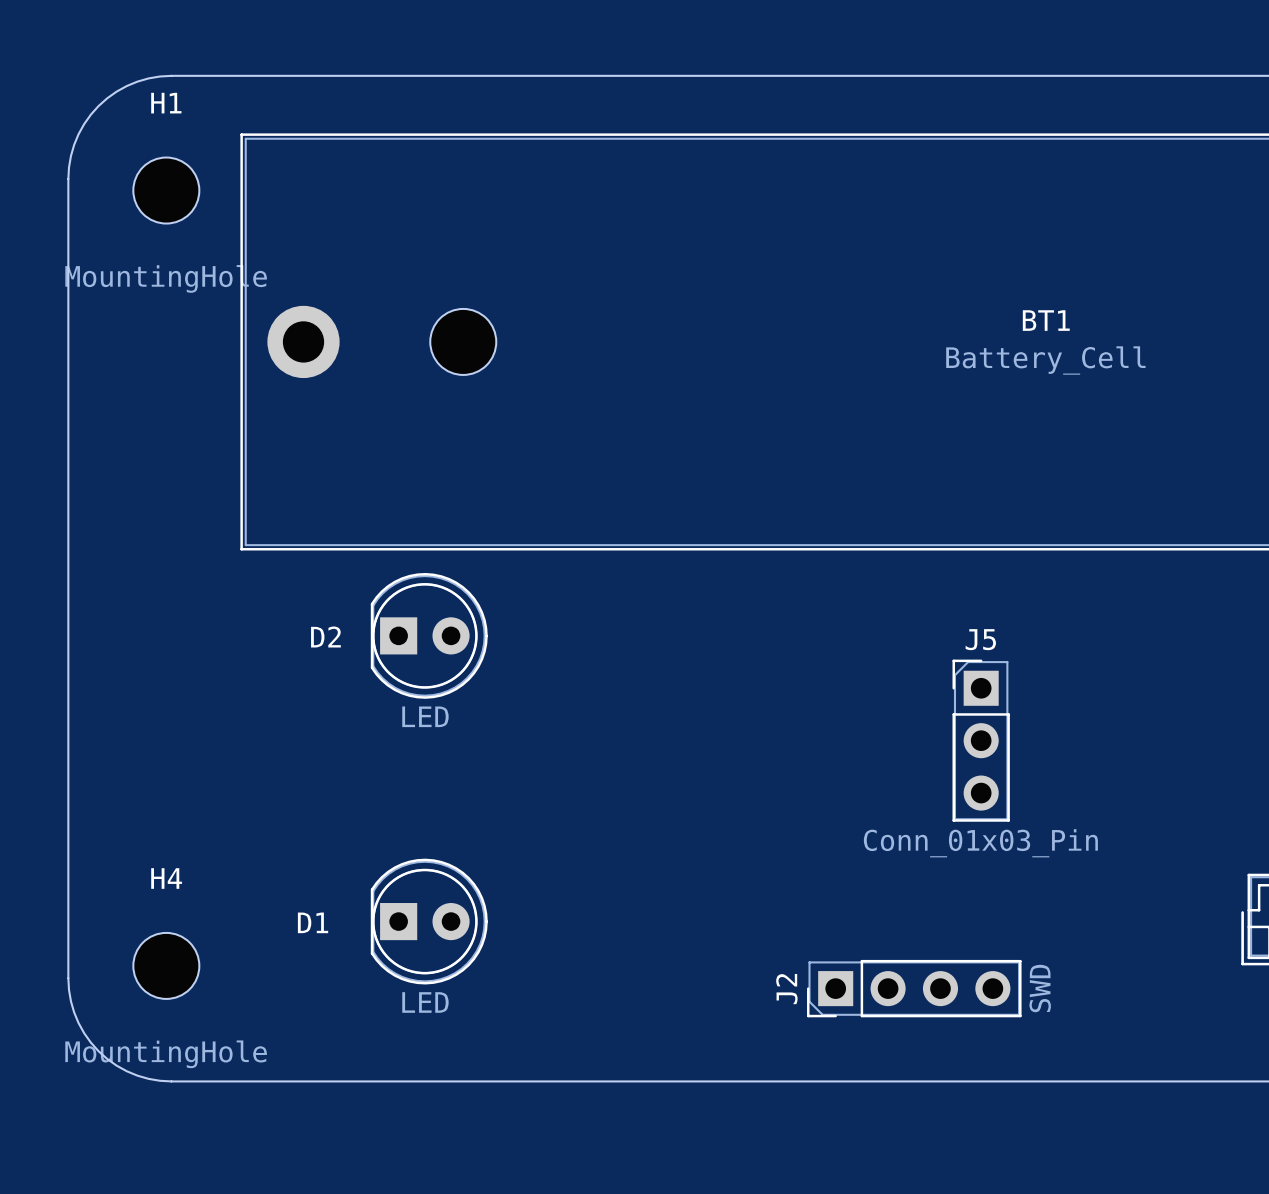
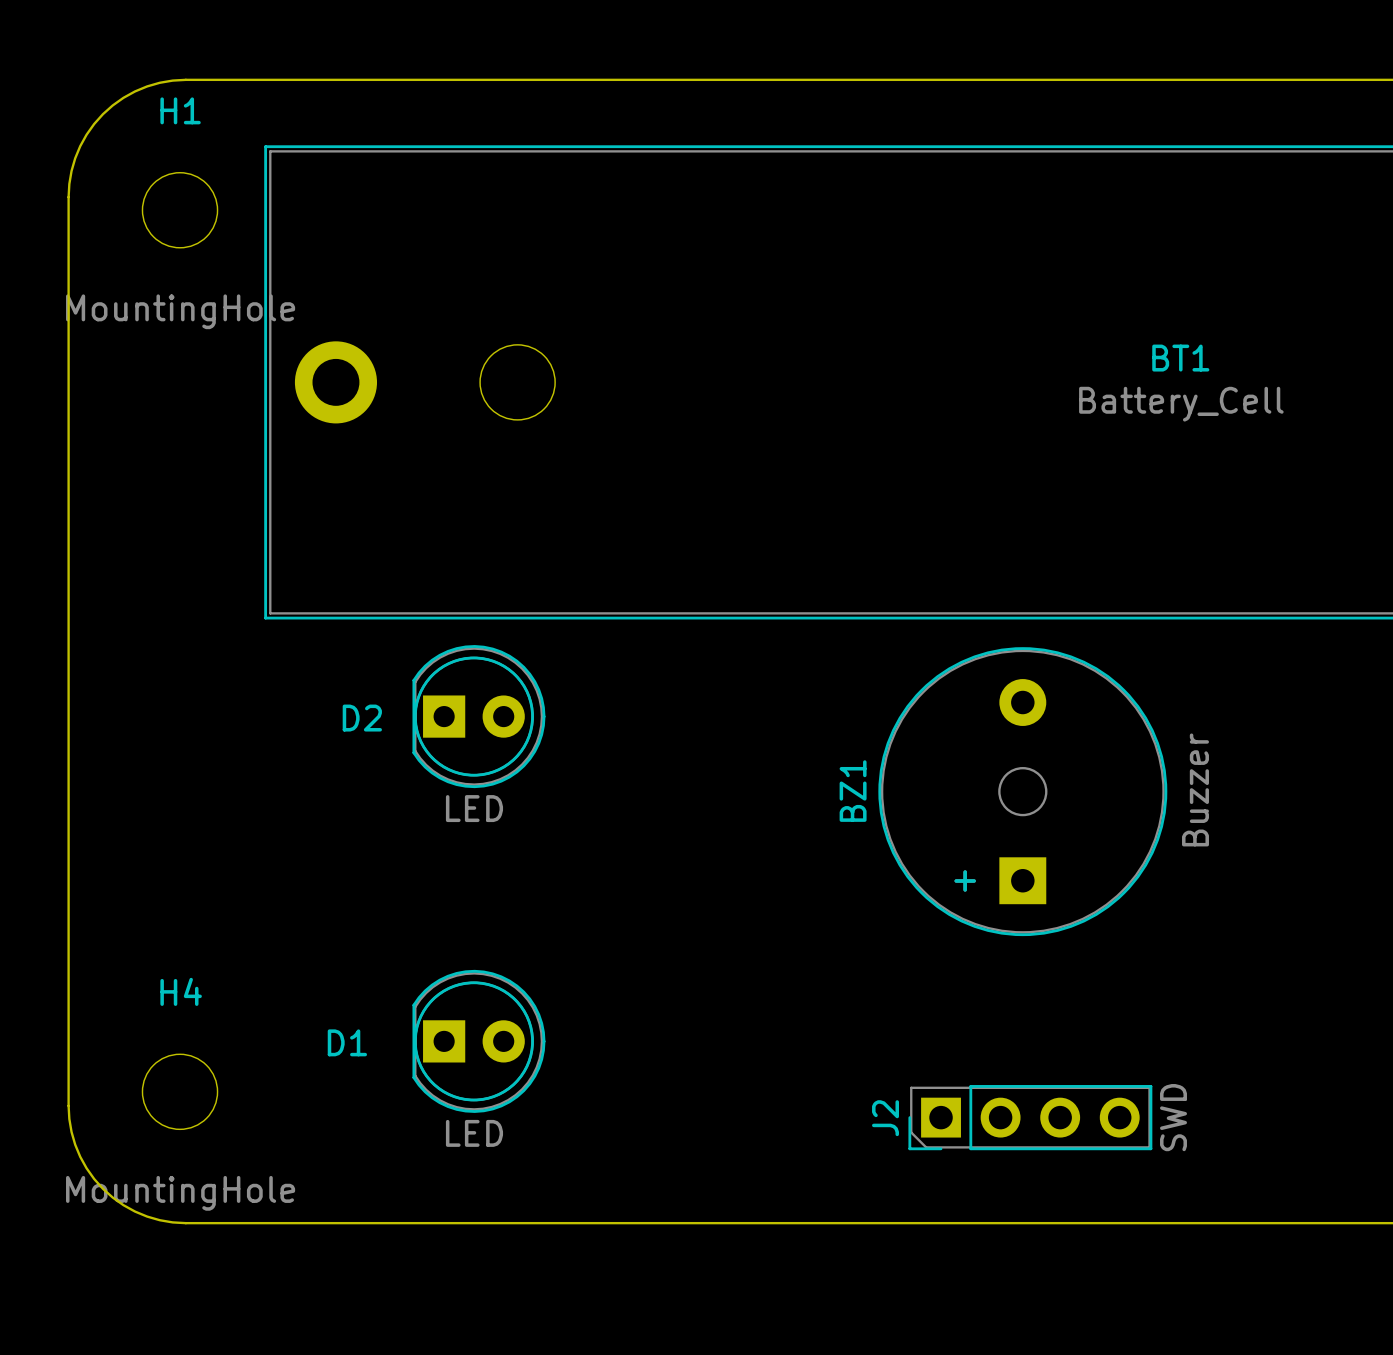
BZ1: none -> Buzzer (1022, 791)
J5: Conn_01x03_Pin (981, 740) -> none

